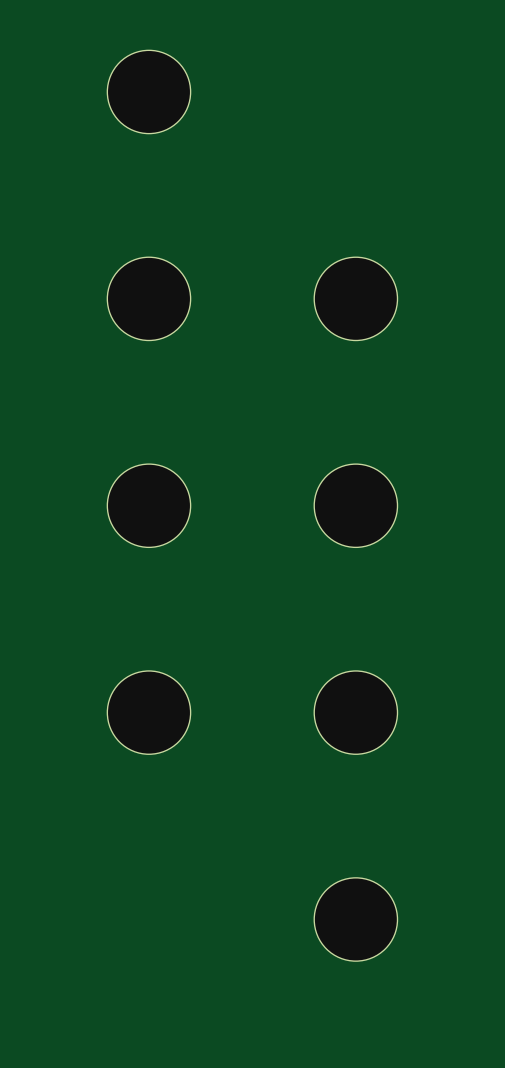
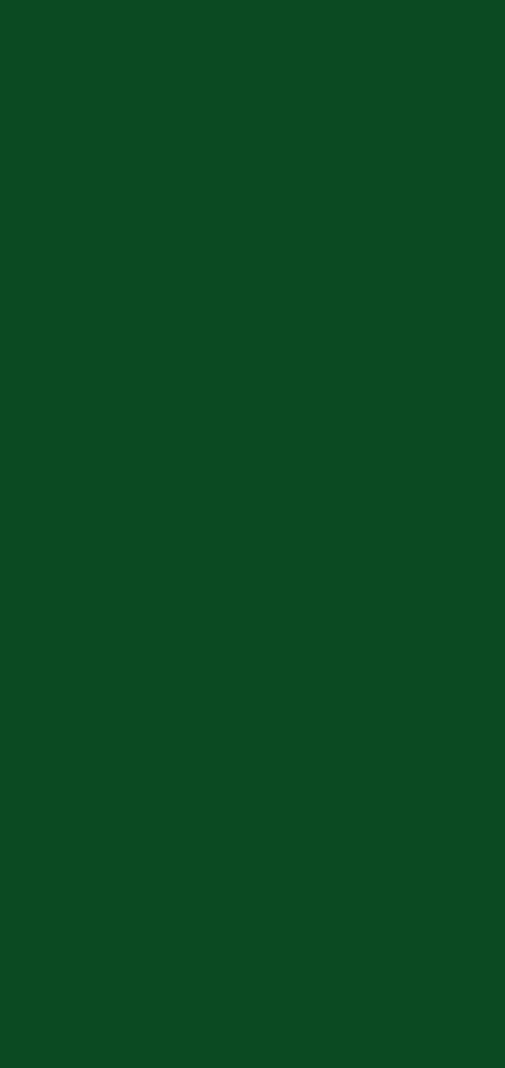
part: (148, 91) -> none
part: (148, 298) -> none
part: (355, 298) -> none
part: (148, 505) -> none
part: (355, 505) -> none
part: (148, 712) -> none
part: (355, 712) -> none
part: (355, 919) -> none

